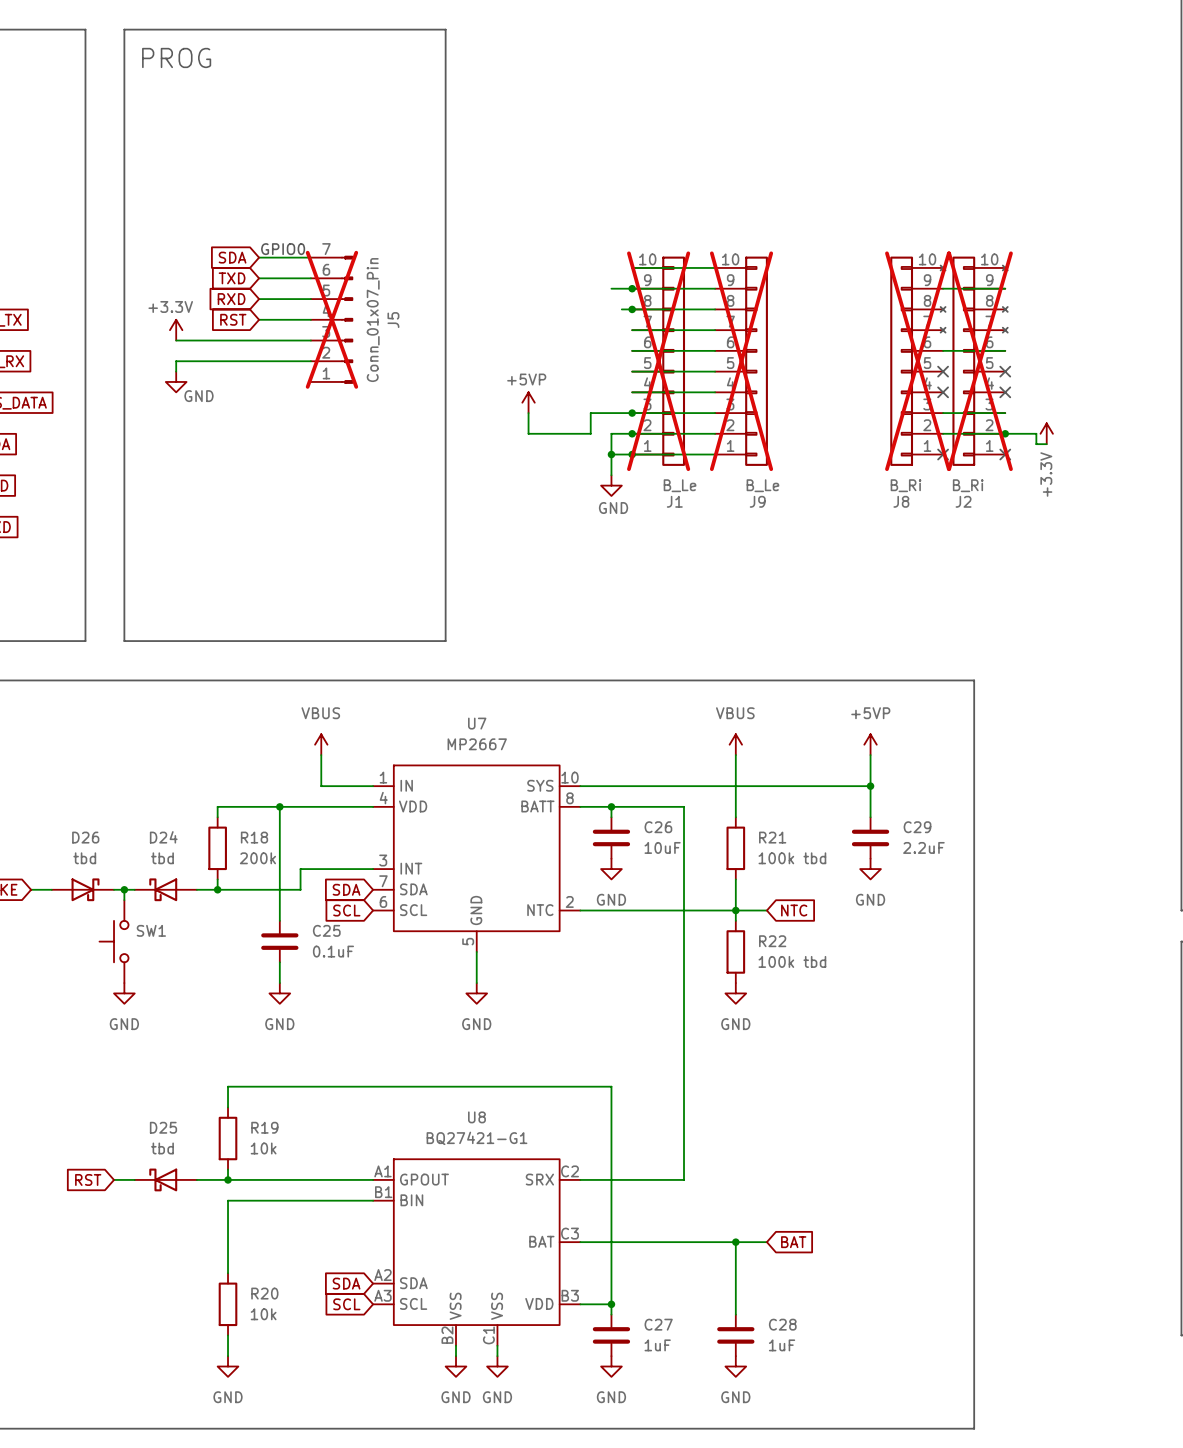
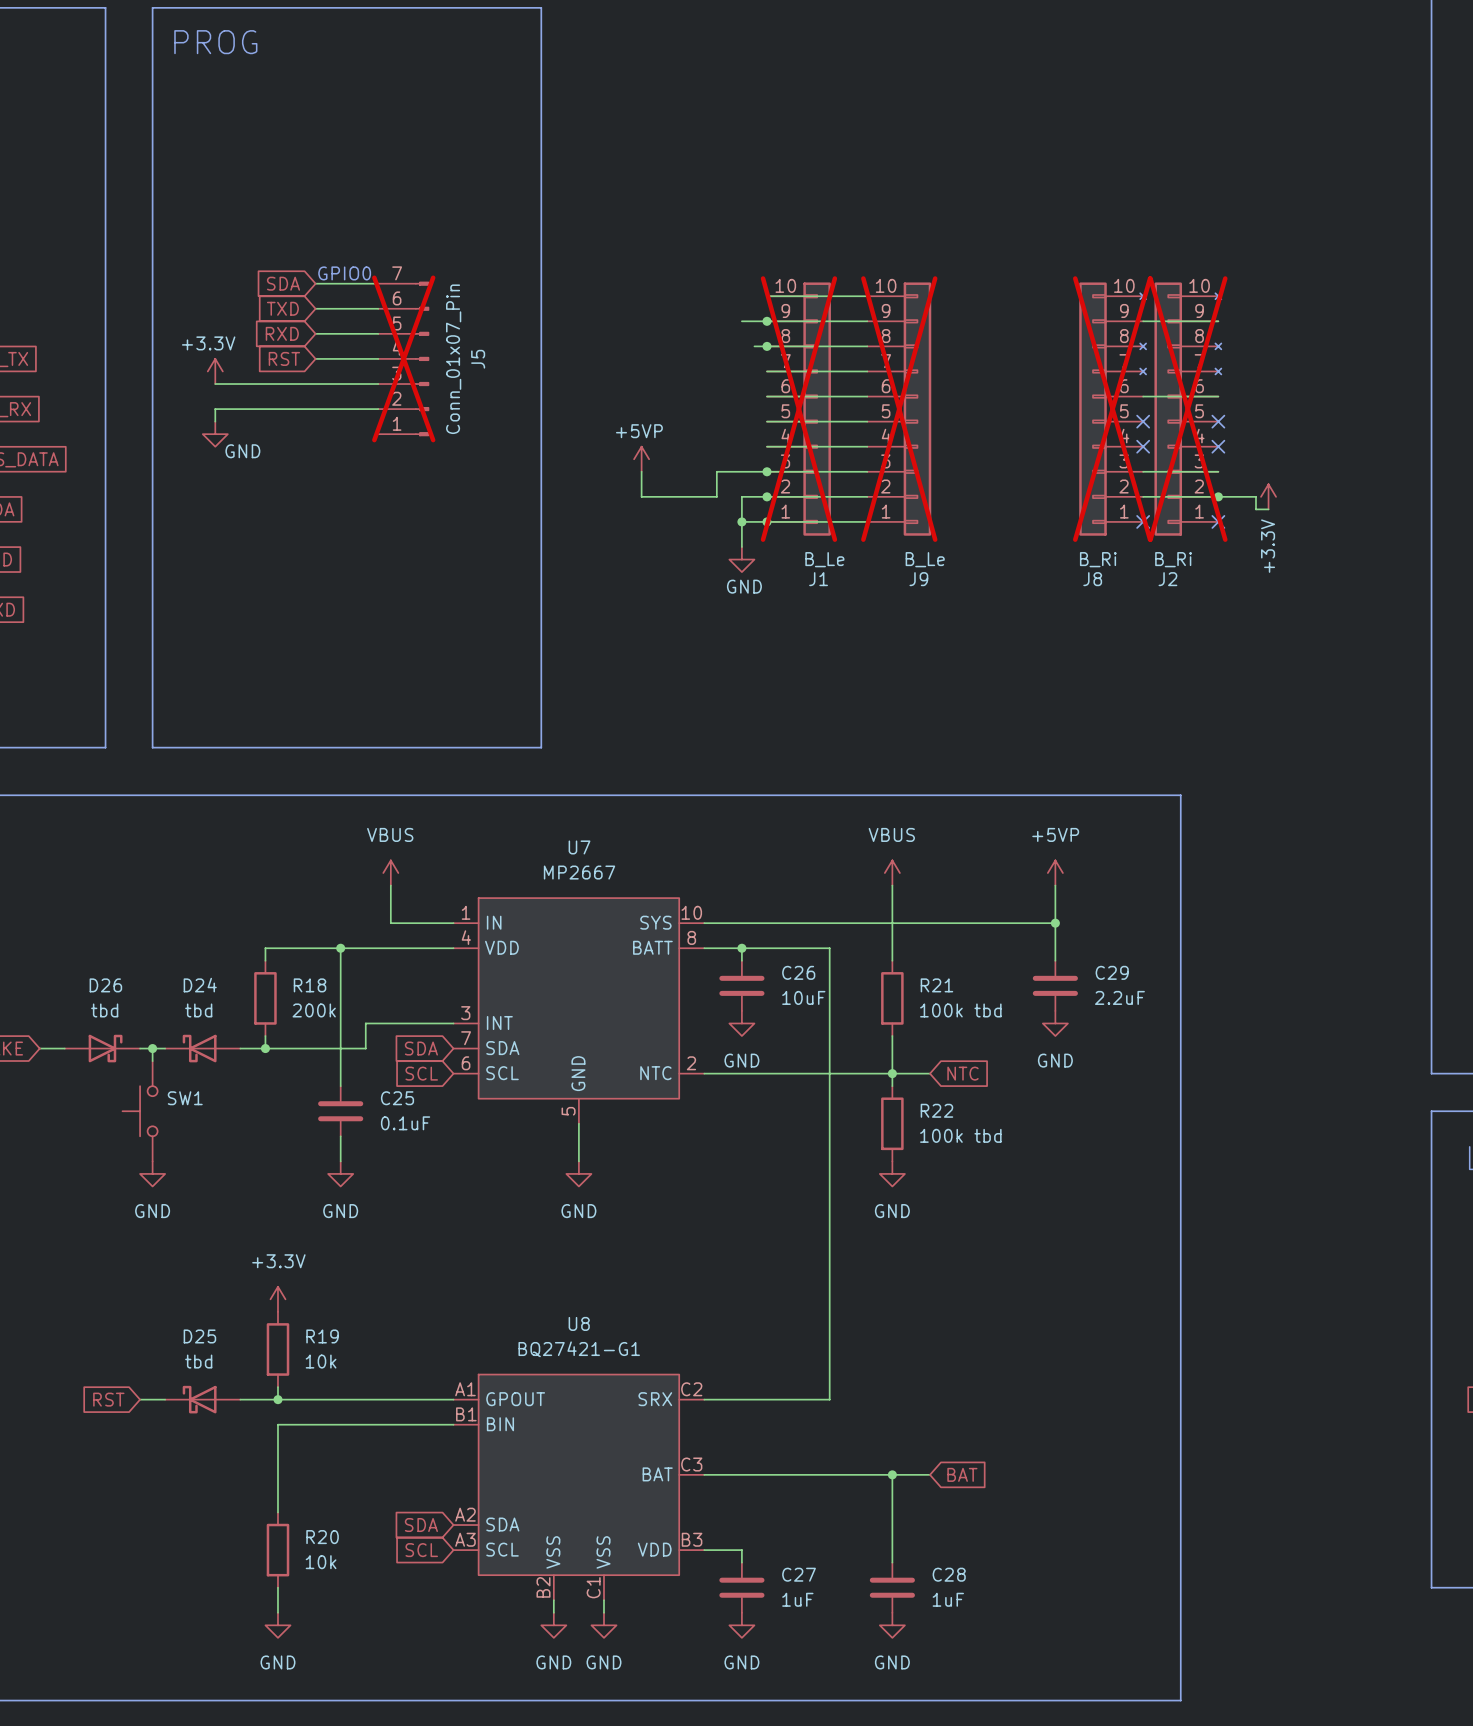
power symbol: none -> +3.3V (277, 1299)
wire: (228, 1107) (228, 1086) (611, 1086) (611, 1304) -> none
junction: (611, 1304) -> none

